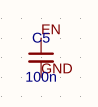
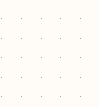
label: EN (50, 29) -> none
C5: 100n (41, 57) -> none
label: GND (56, 68) -> none

